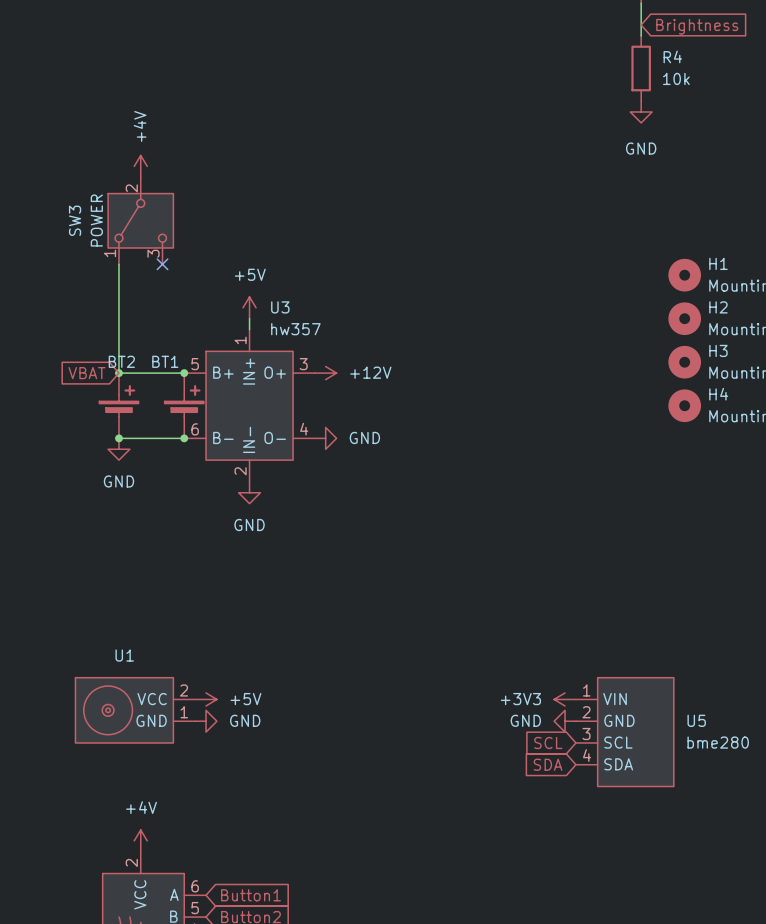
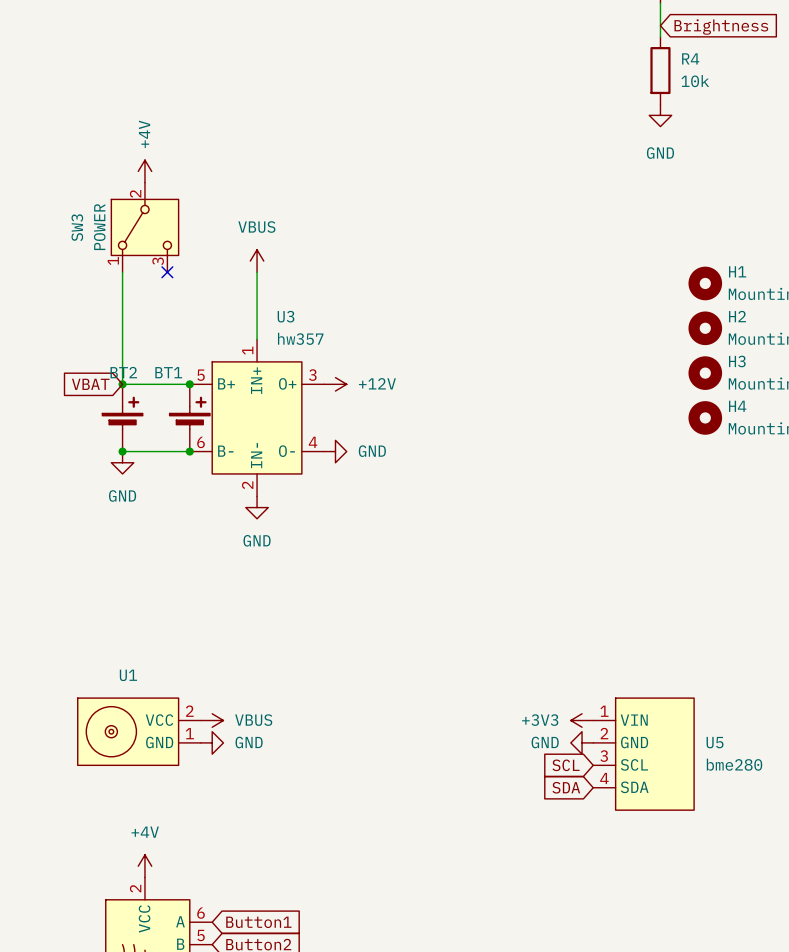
power symbol: none -> VBUS (257, 261)
wire: none -> (257, 272) (257, 328)
power symbol: +5V (249, 307) -> none
power symbol: +5V (206, 699) -> VBUS (212, 720)

